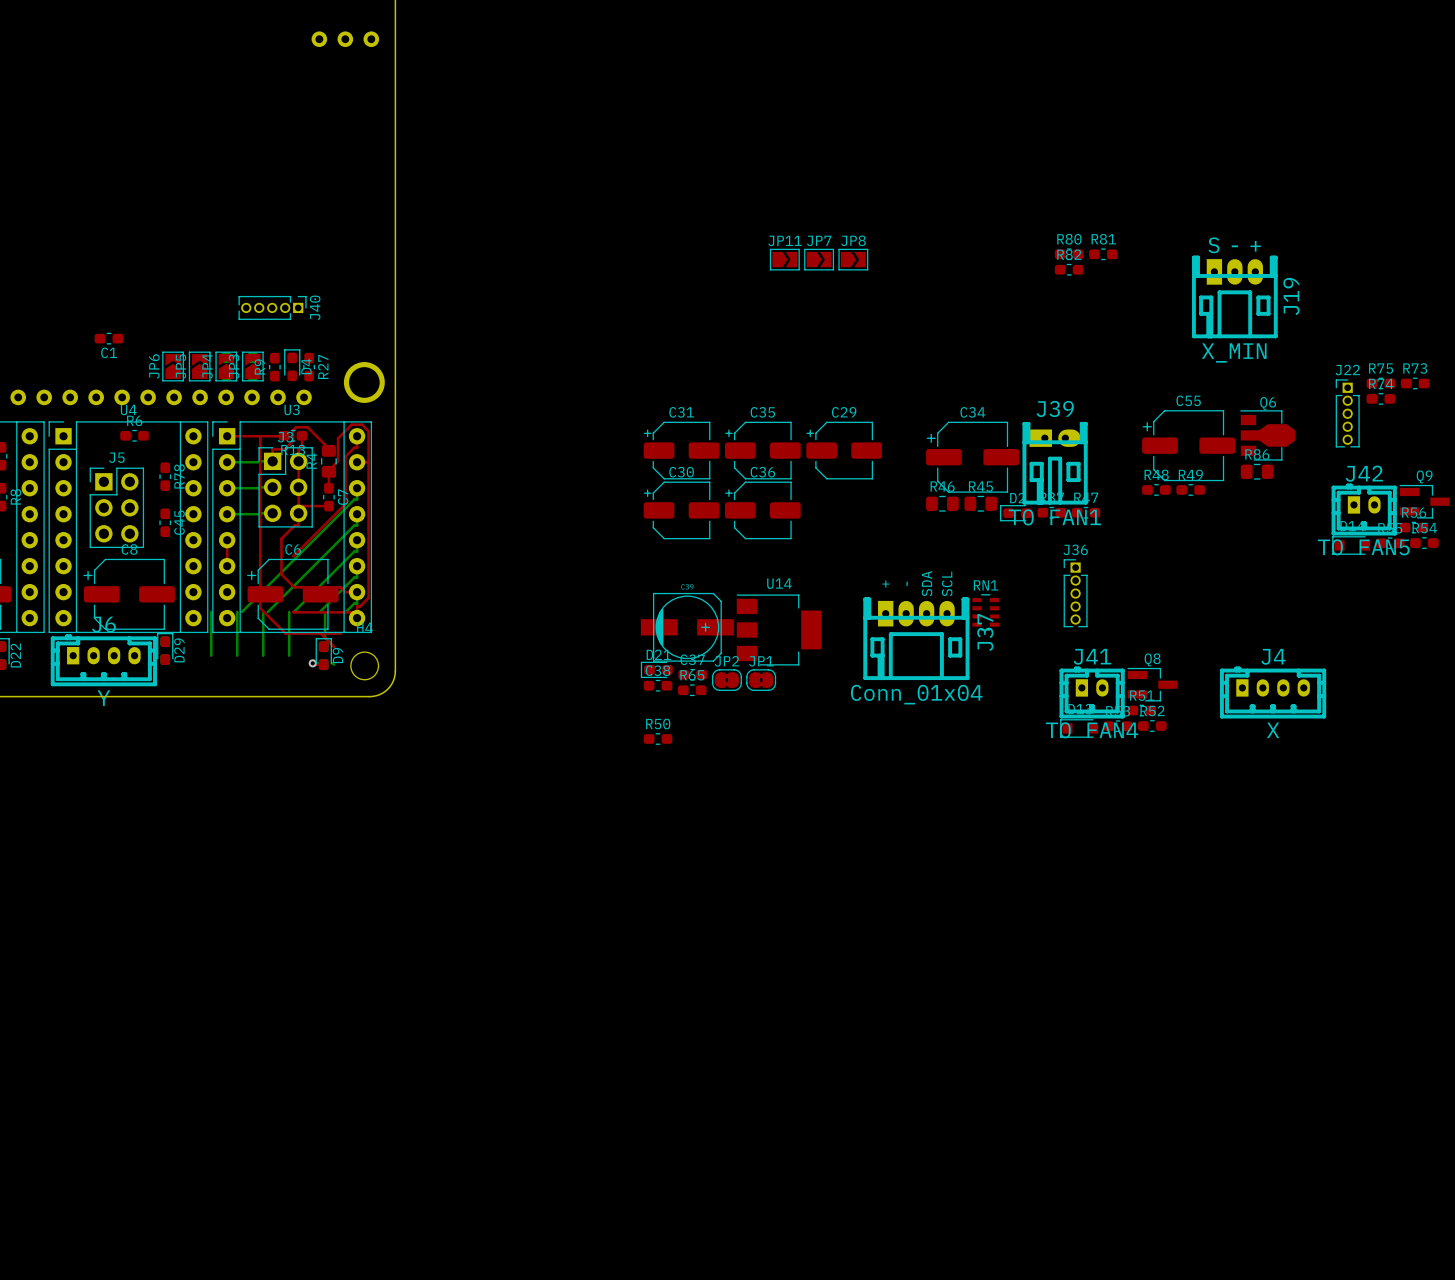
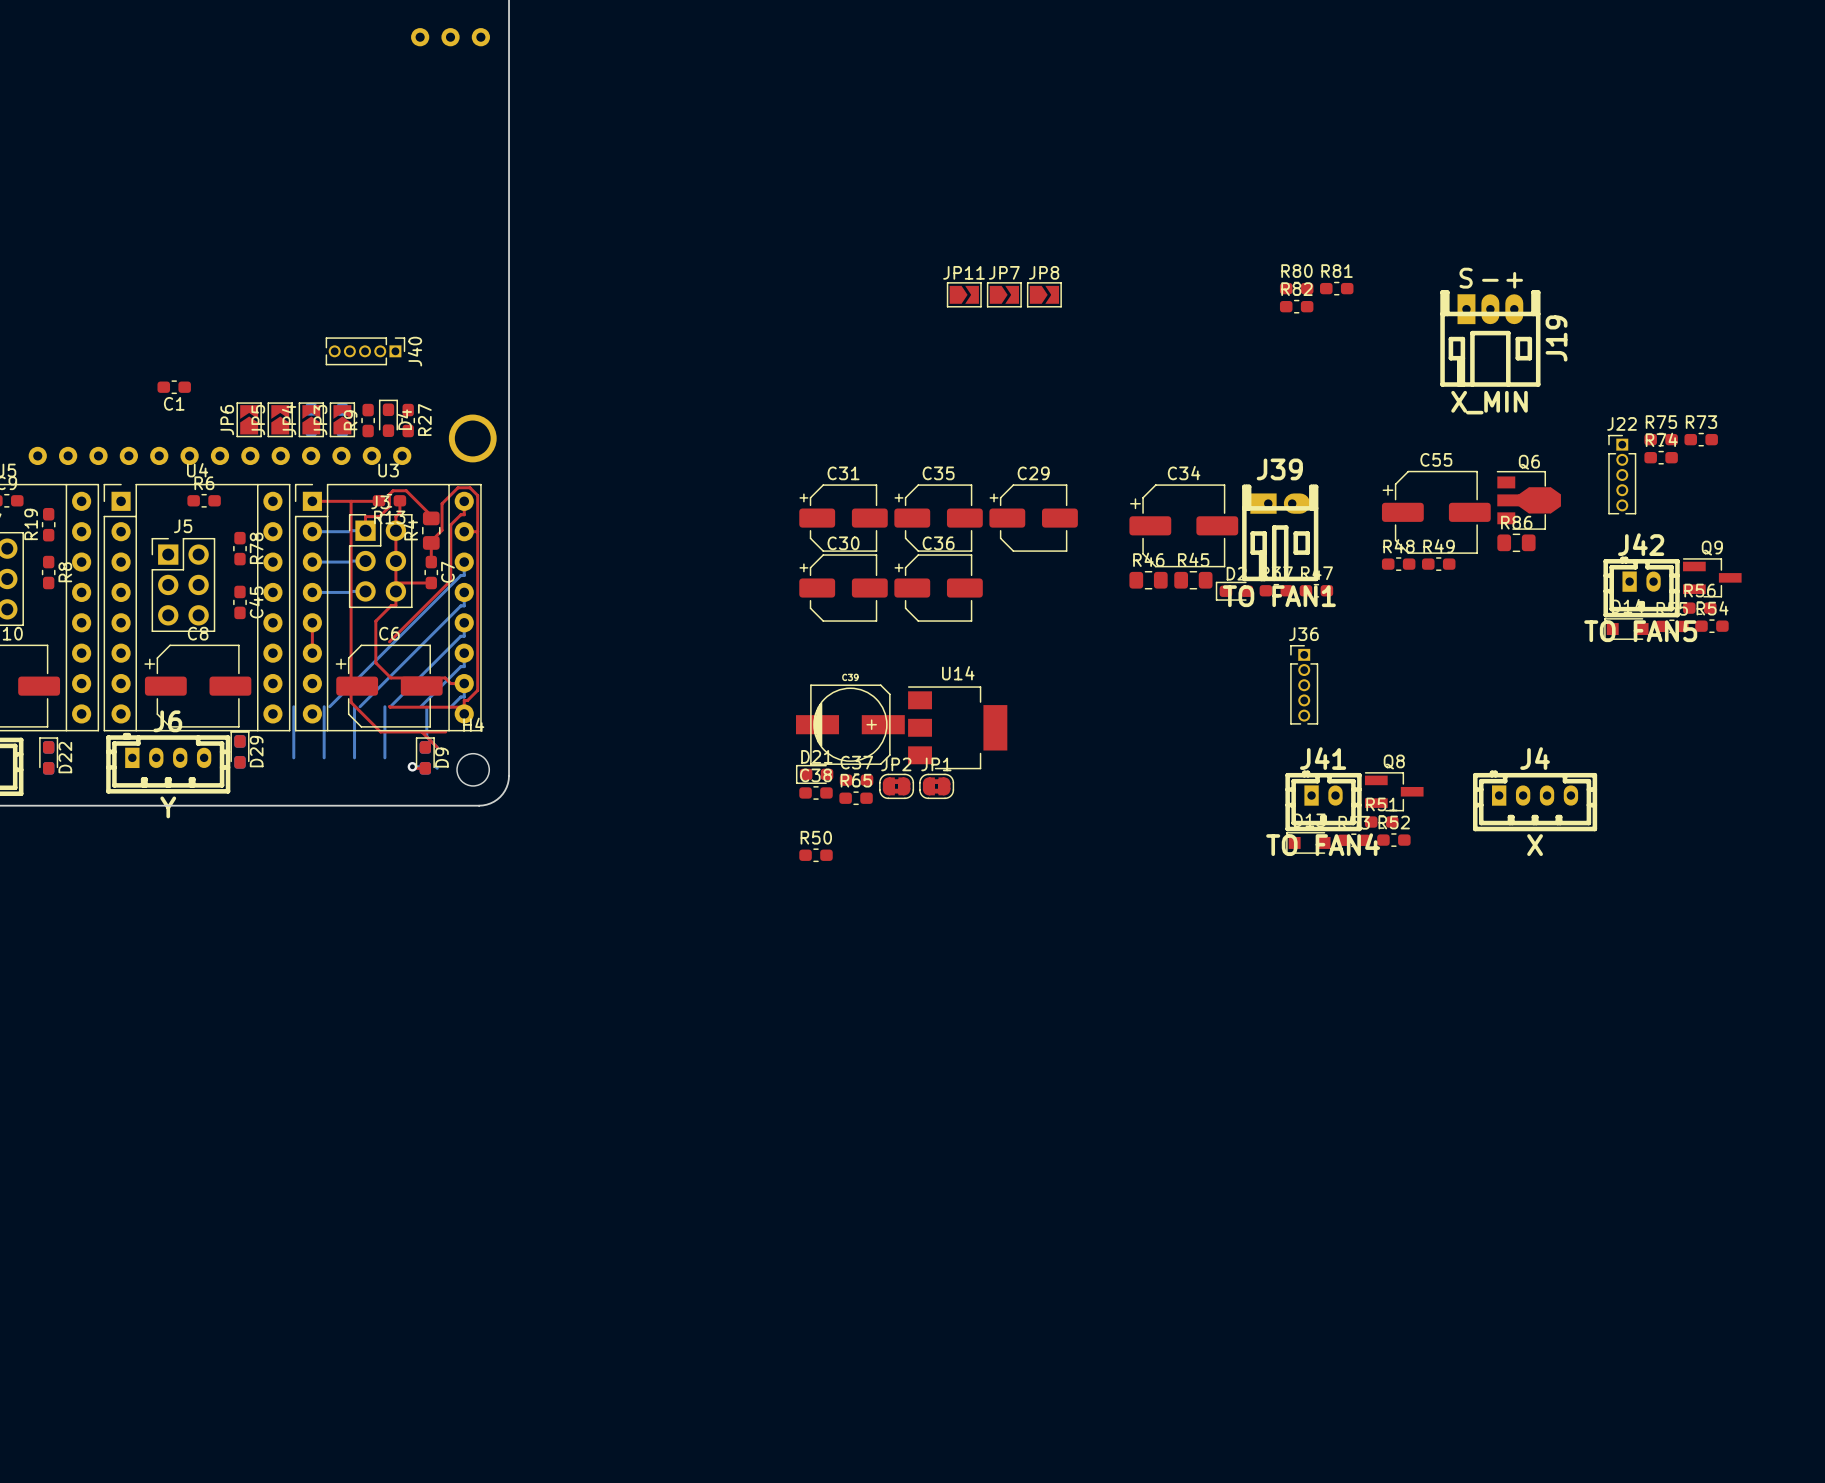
RN1: (985, 612) -> none
J37: Conn_01x04 (916, 638) -> none

